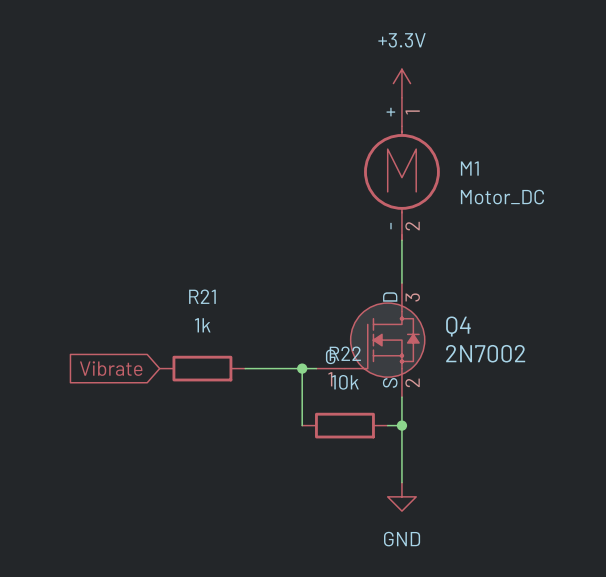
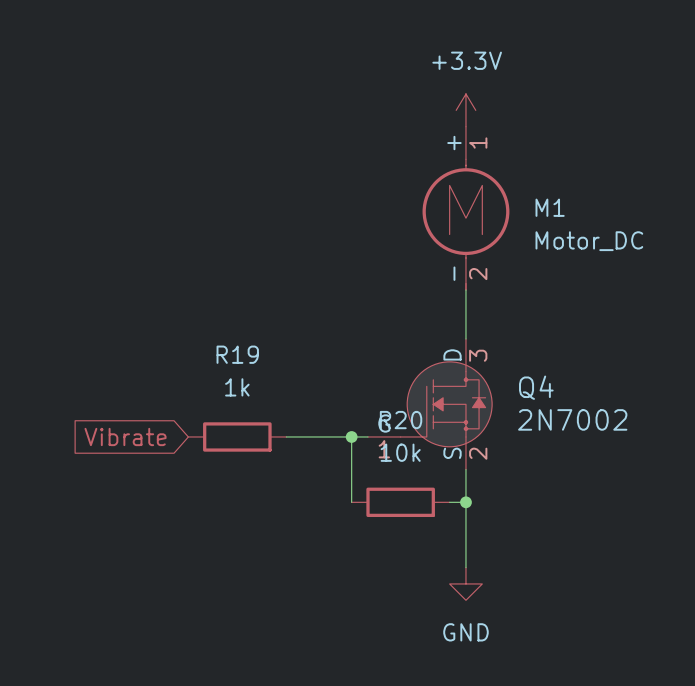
R21 name: R21 (202, 296) -> R19 (237, 354)
R22 name: R22 (345, 353) -> R20 (401, 420)

